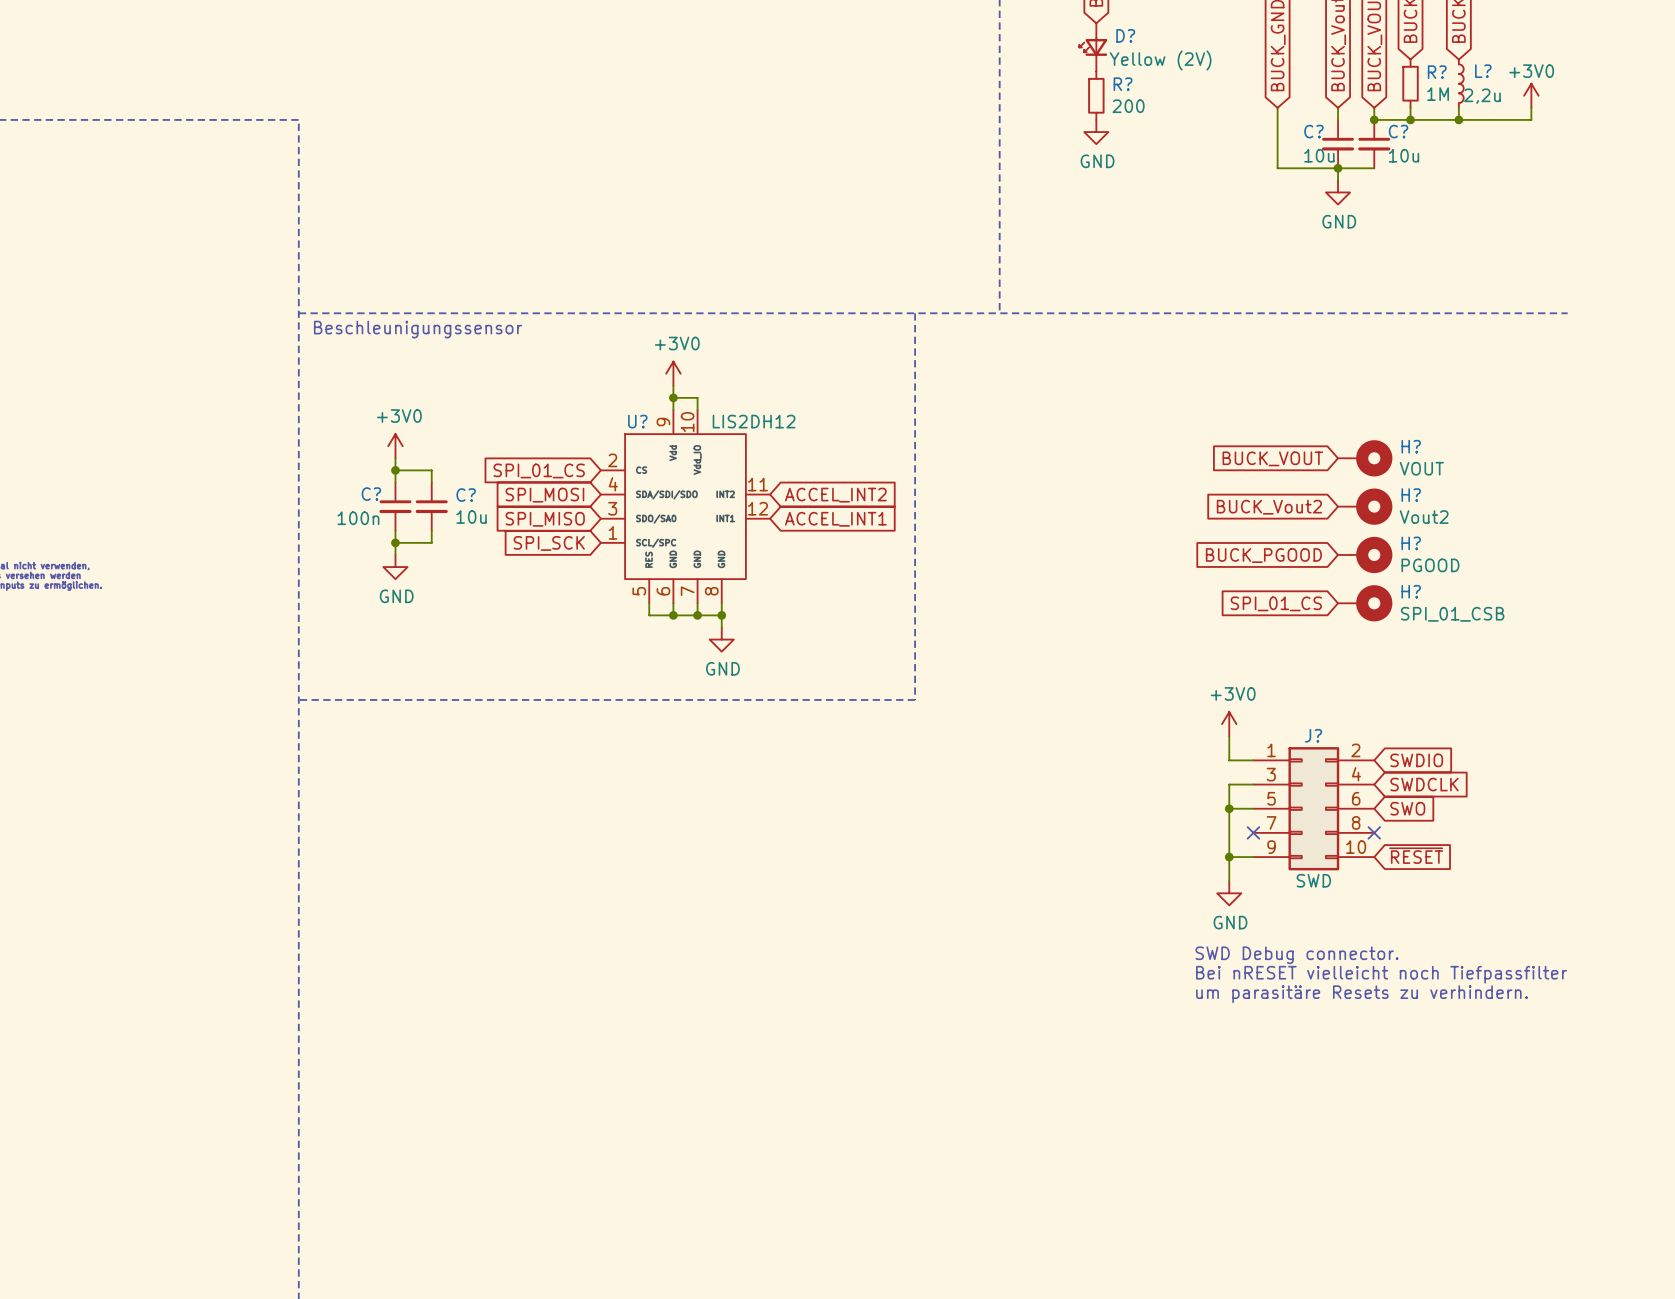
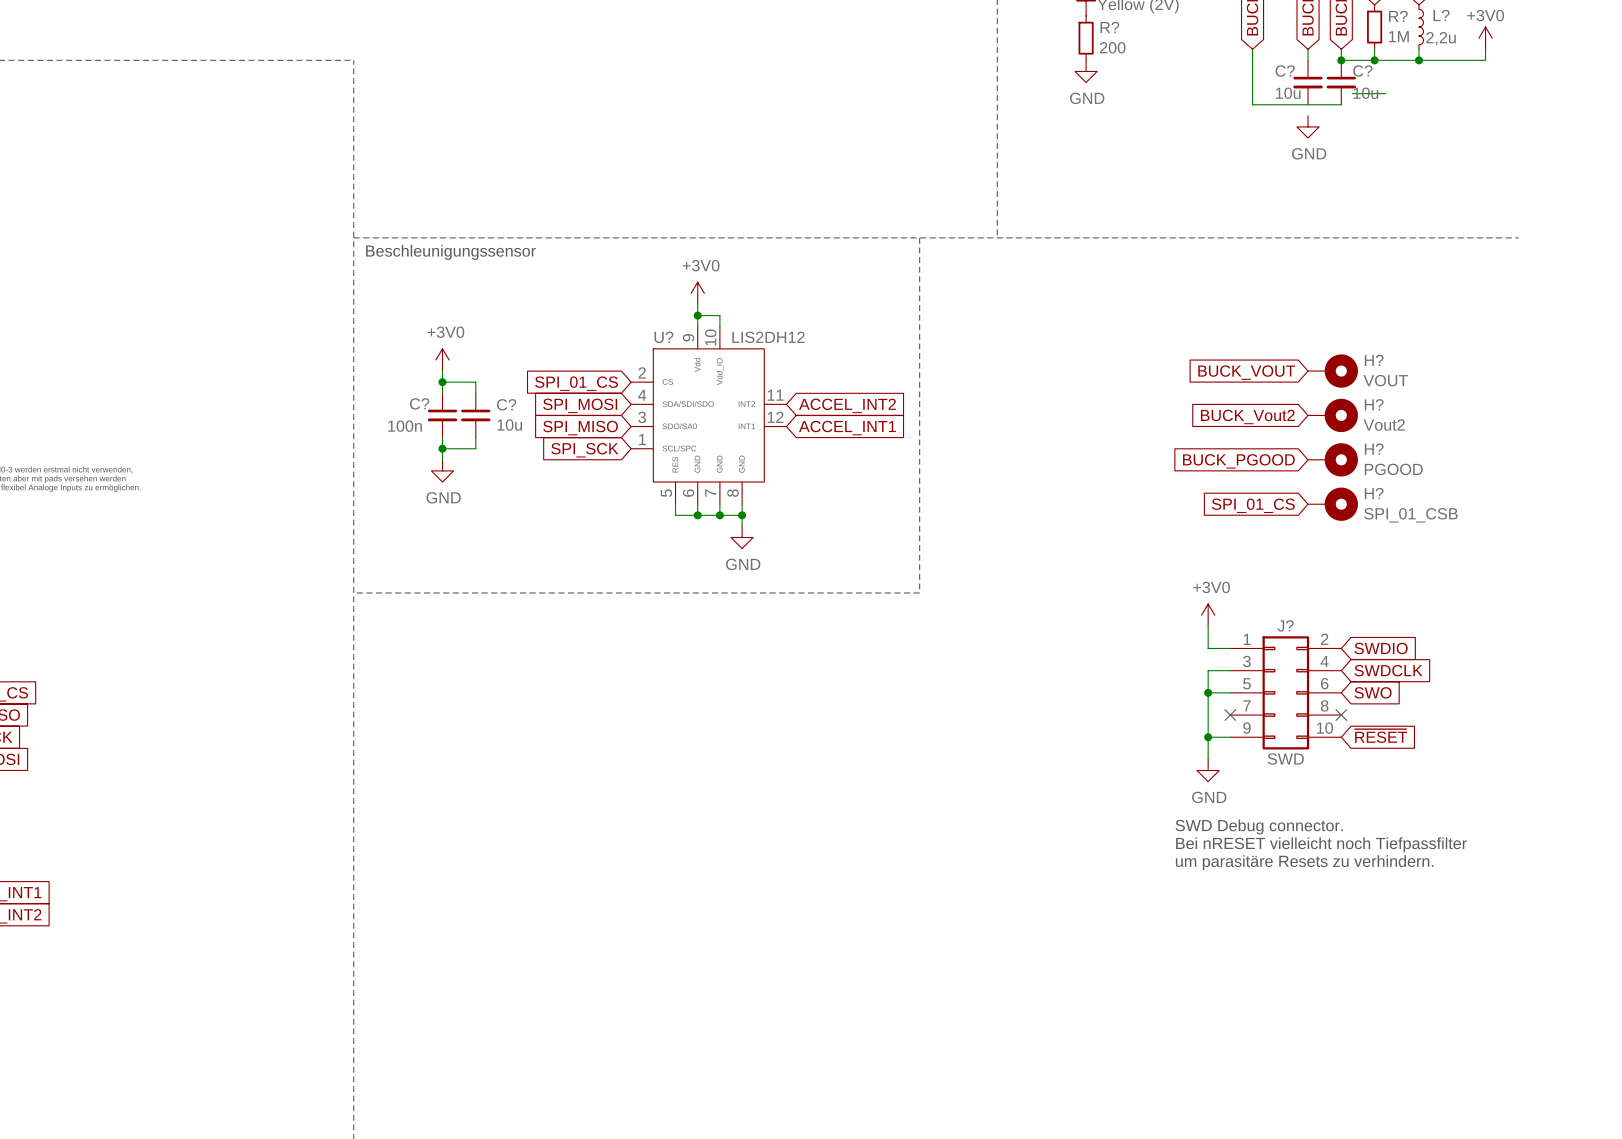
wire: none -> (1352, 93) (1385, 93)
wire: (1338, 168) (1338, 180) -> none
junction: (1338, 168) -> none

